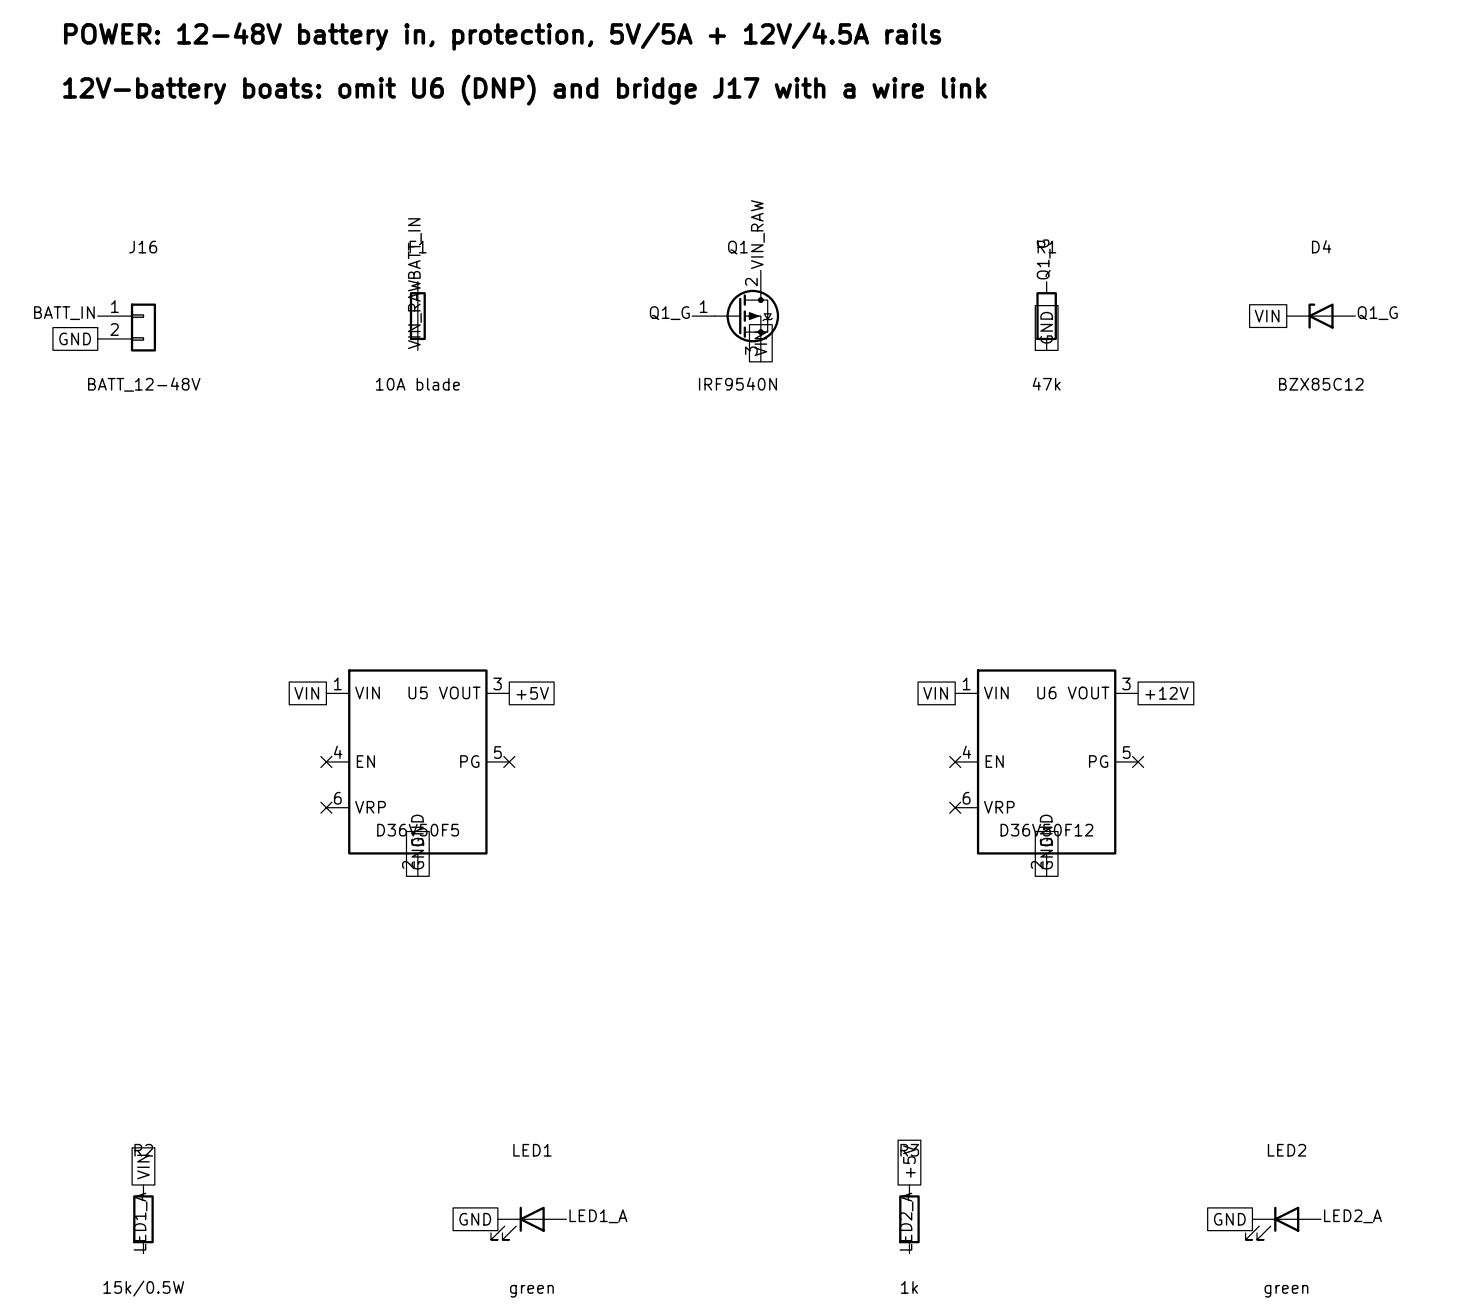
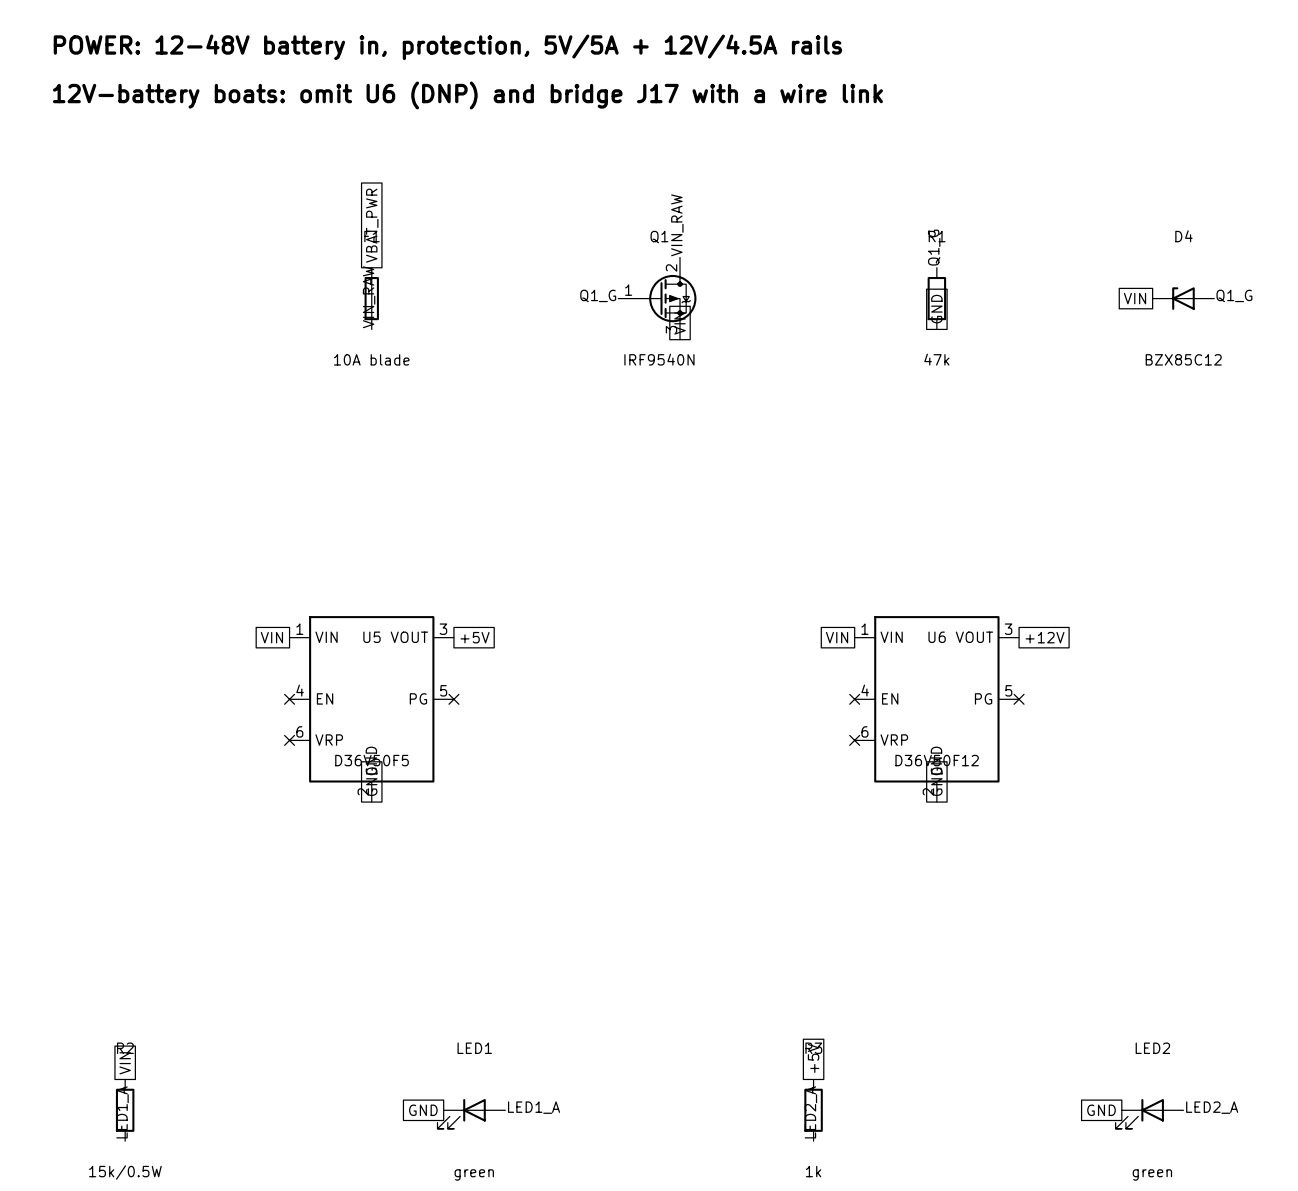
global label: none -> VBAT_PWR (372, 225)
label: BATT_IN (414, 248) -> none
label: BATT_IN (64, 313) -> none
J16: BATT_12-48V (126, 327) -> none
global label: GND (75, 338) -> none

